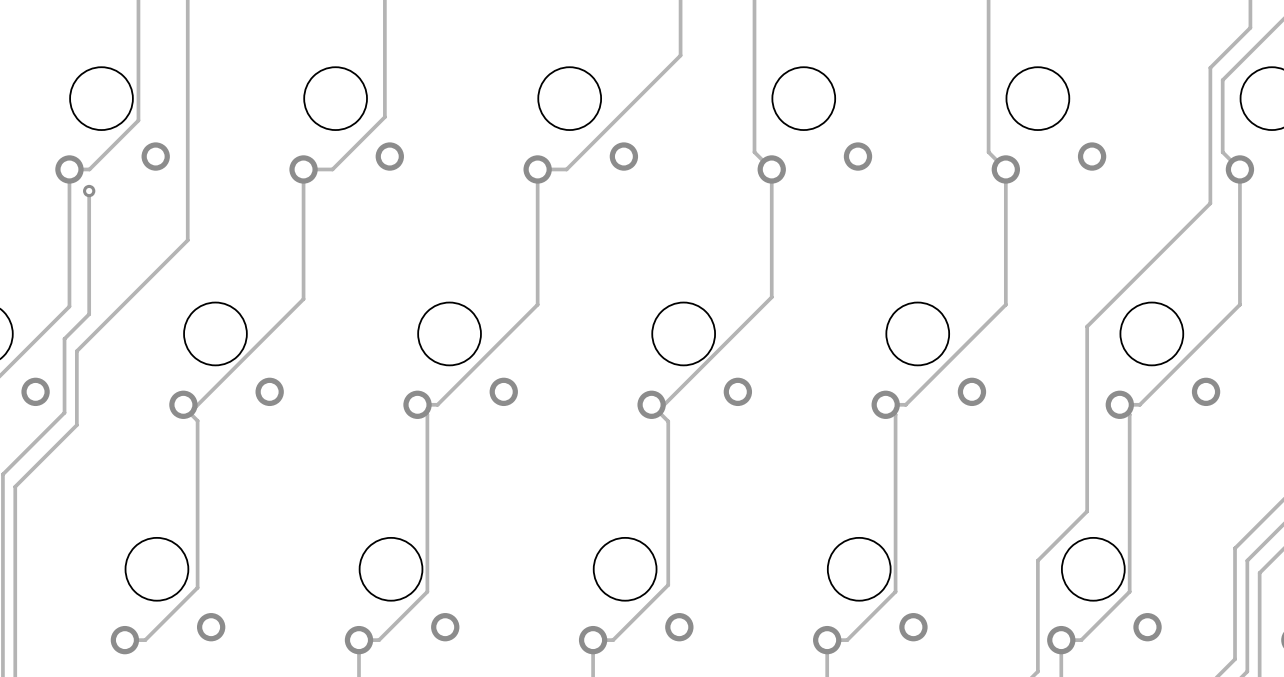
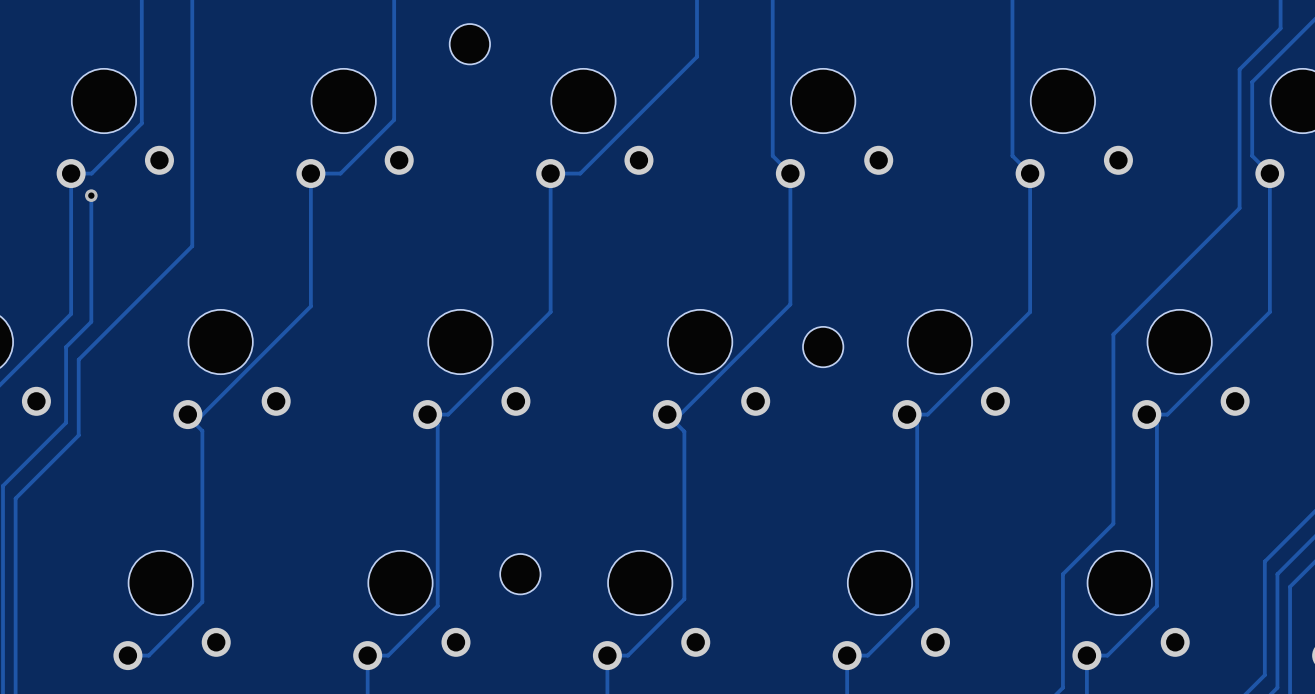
part: none -> (469, 44)
part: none -> (823, 347)
part: none -> (520, 574)

